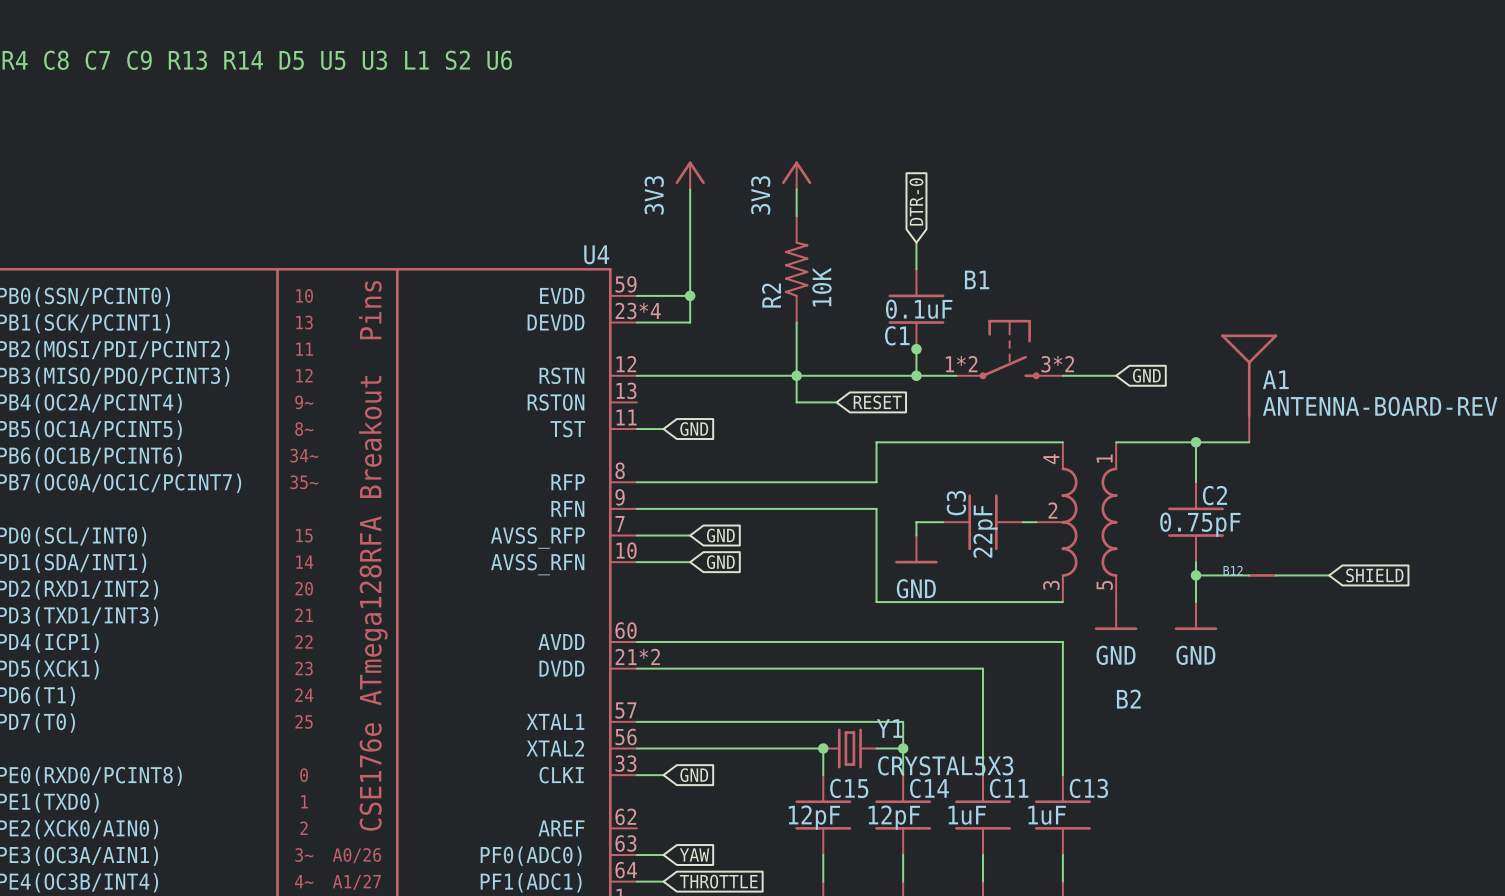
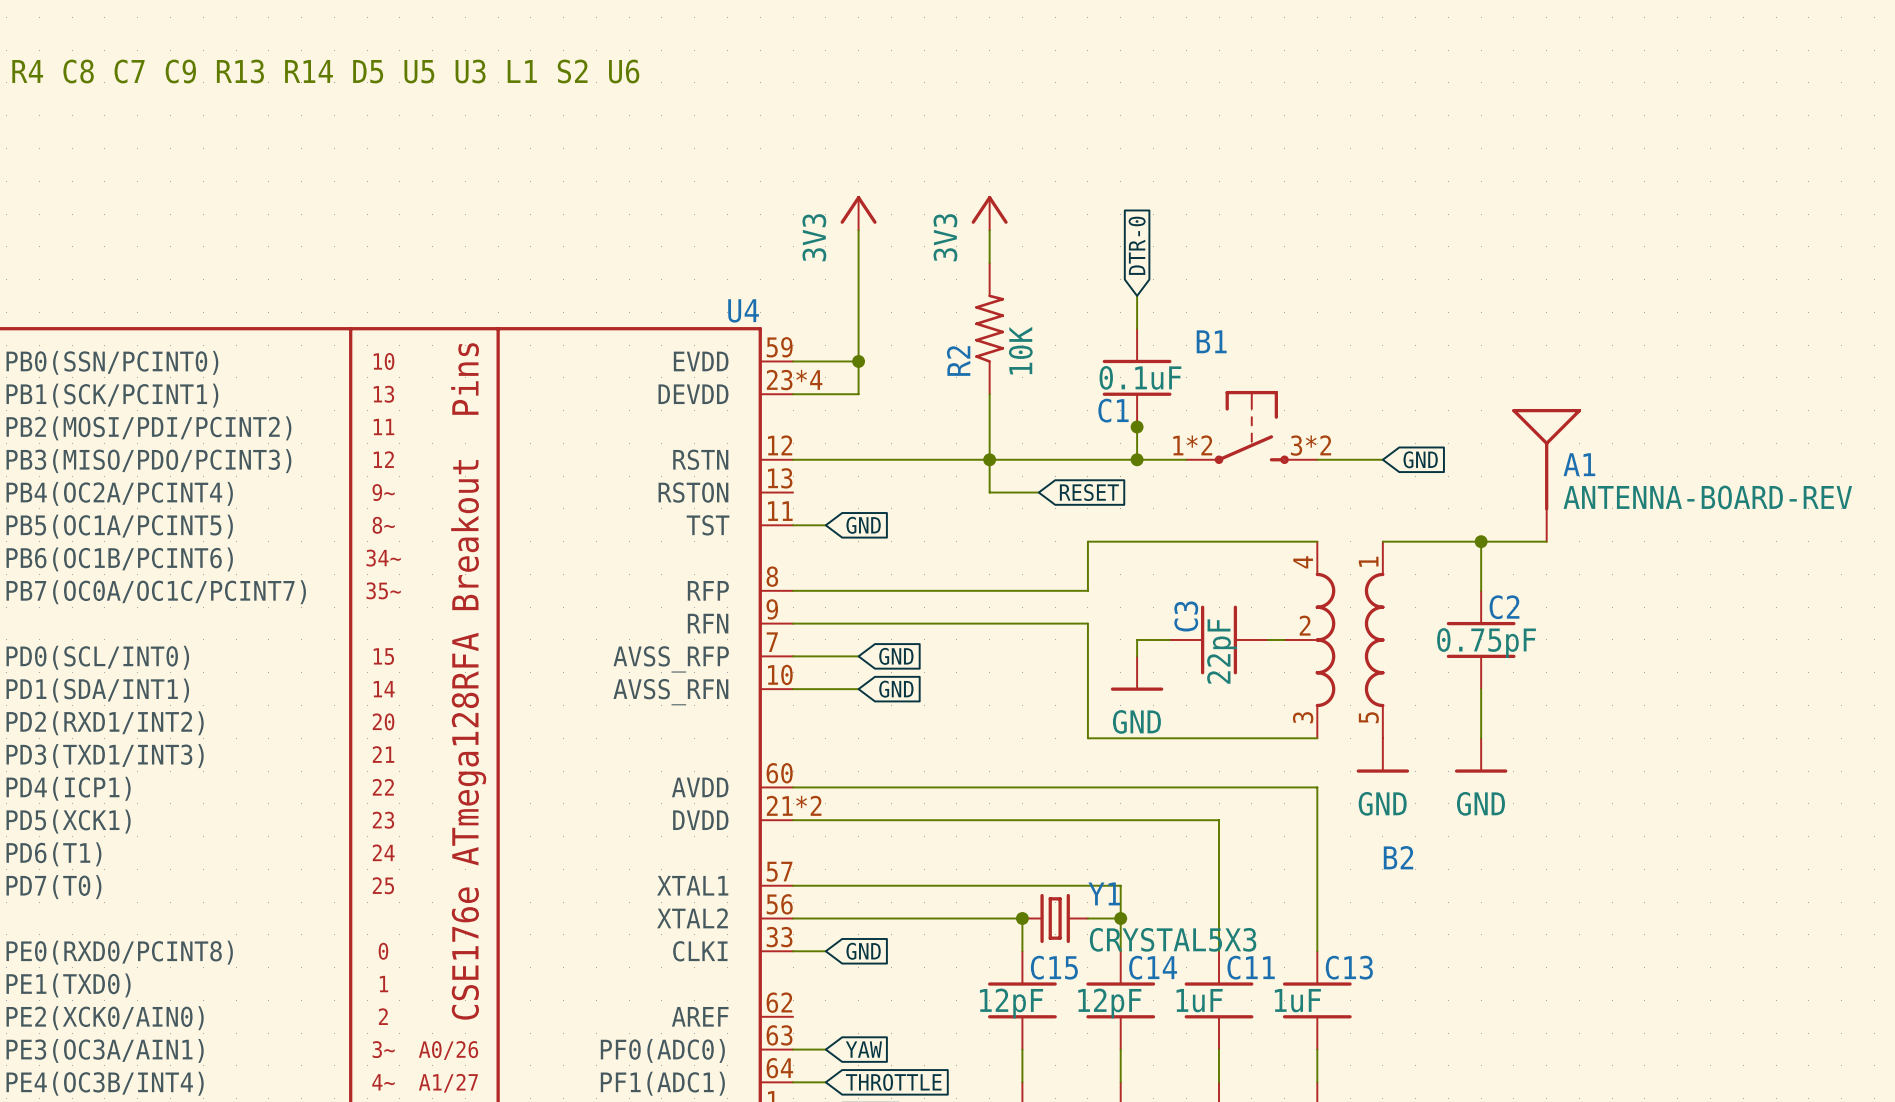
wire: (1196, 575) (1249, 575) -> none
junction: (1196, 575) -> none
B12: (1262, 575) -> none
wire: (1275, 575) (1329, 575) -> none
global label: SHIELD (1374, 575) -> none

